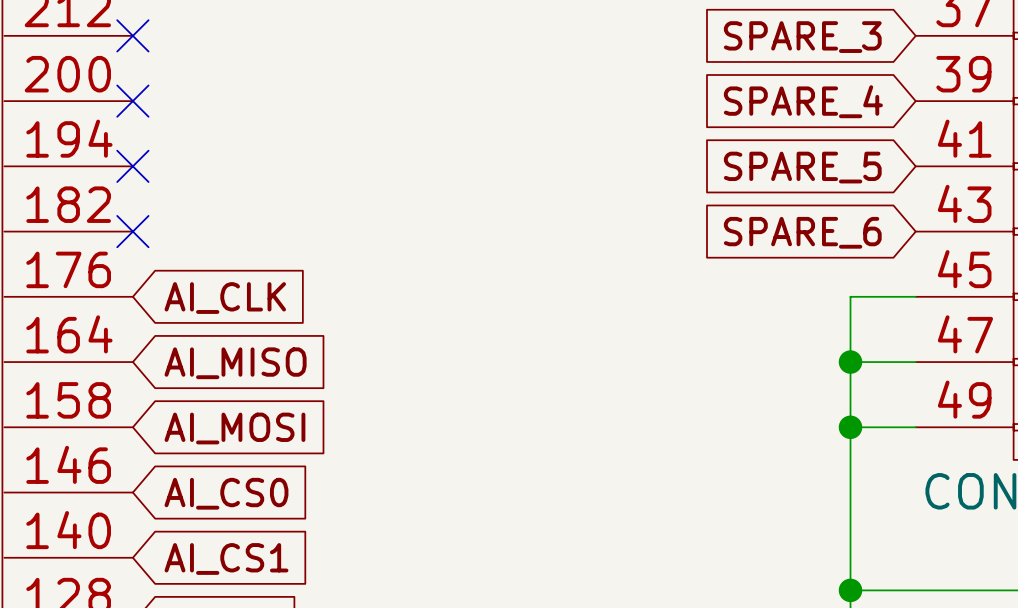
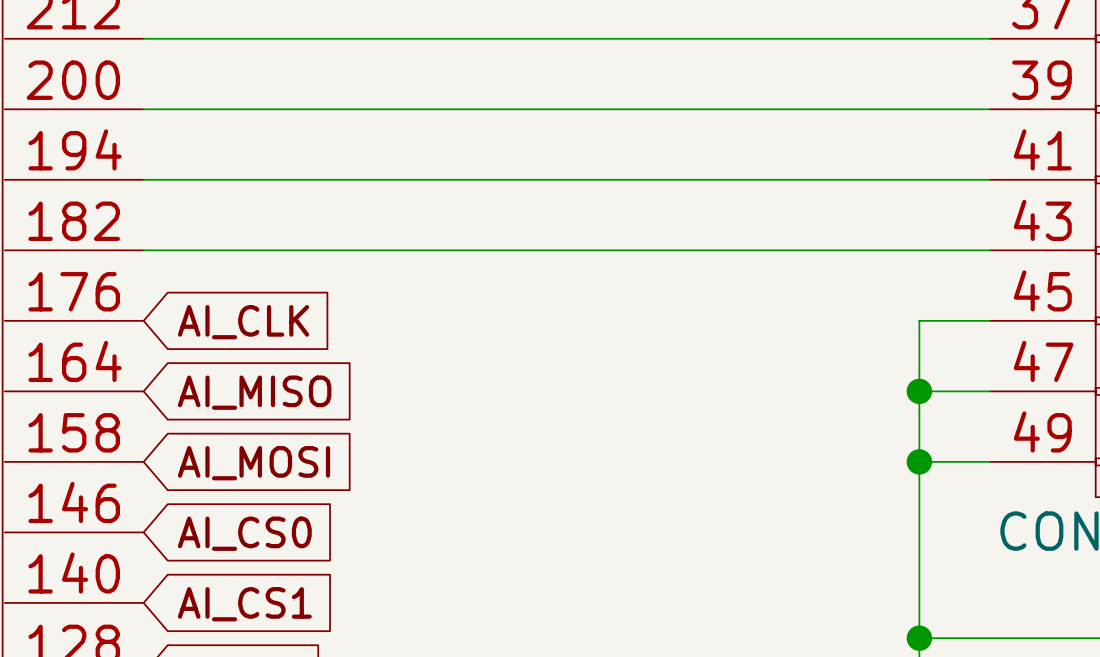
wire: none -> (143, 38) (989, 38)
no-connect mark: (132, 35) -> none
global label: SPARE_3 (802, 37) -> none
wire: none -> (143, 109) (989, 109)
no-connect mark: (132, 101) -> none
global label: SPARE_4 (803, 101) -> none
wire: none -> (143, 179) (989, 179)
no-connect mark: (132, 166) -> none
global label: SPARE_5 (802, 167) -> none
wire: none -> (143, 250) (989, 250)
no-connect mark: (132, 231) -> none
global label: SPARE_6 (802, 232) -> none

